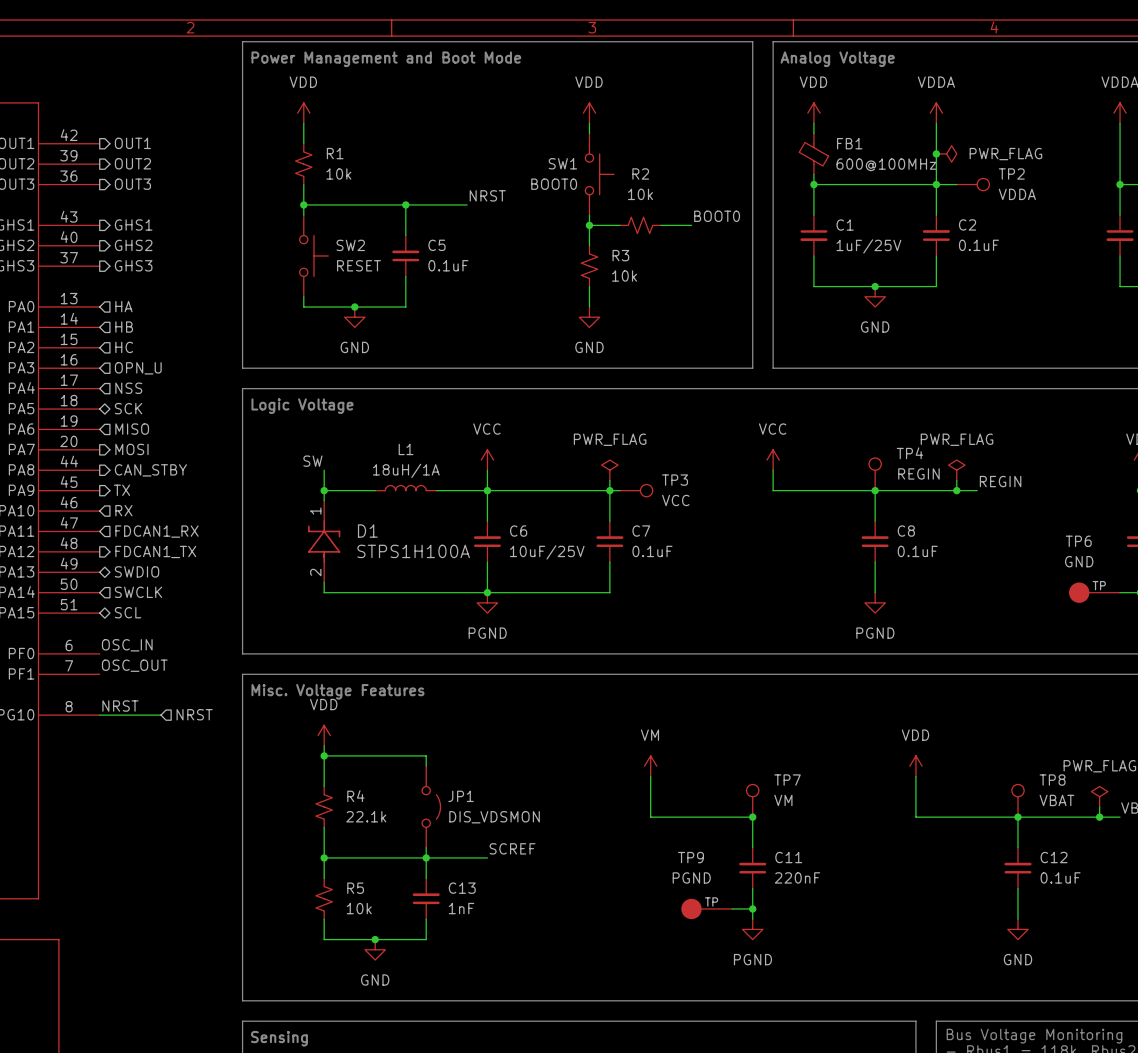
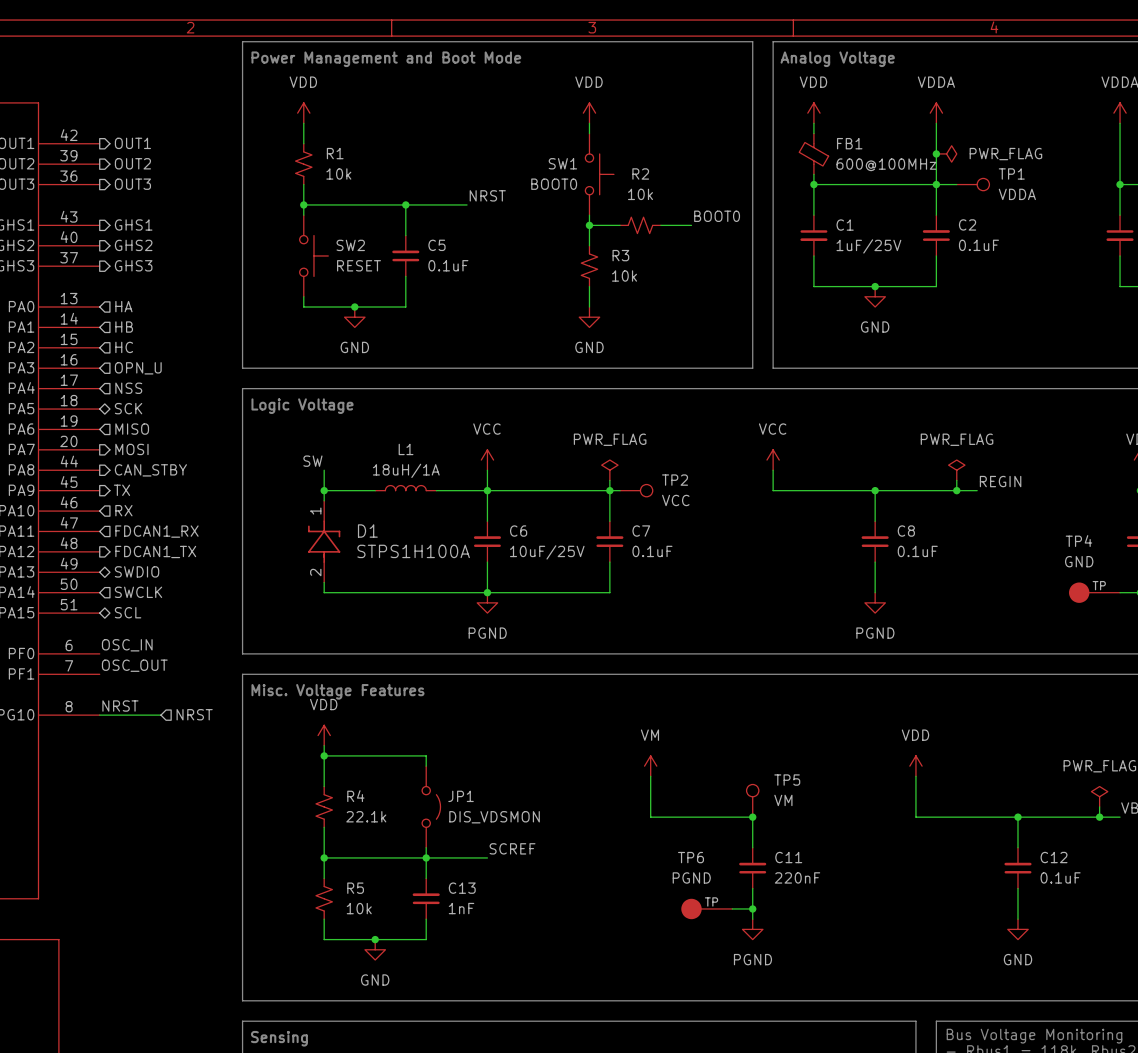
TP2 name: TP2 (1011, 173) -> TP1 (1011, 173)
TP4: REGIN (875, 474) -> none
TP3 name: TP3 (675, 480) -> TP2 (675, 480)
TP6 name: TP6 (1078, 541) -> TP4 (1078, 541)
TP7 name: TP7 (787, 780) -> TP5 (787, 780)
TP8: VBAT (1017, 800) -> none
TP9 name: TP9 (691, 857) -> TP6 (691, 857)

